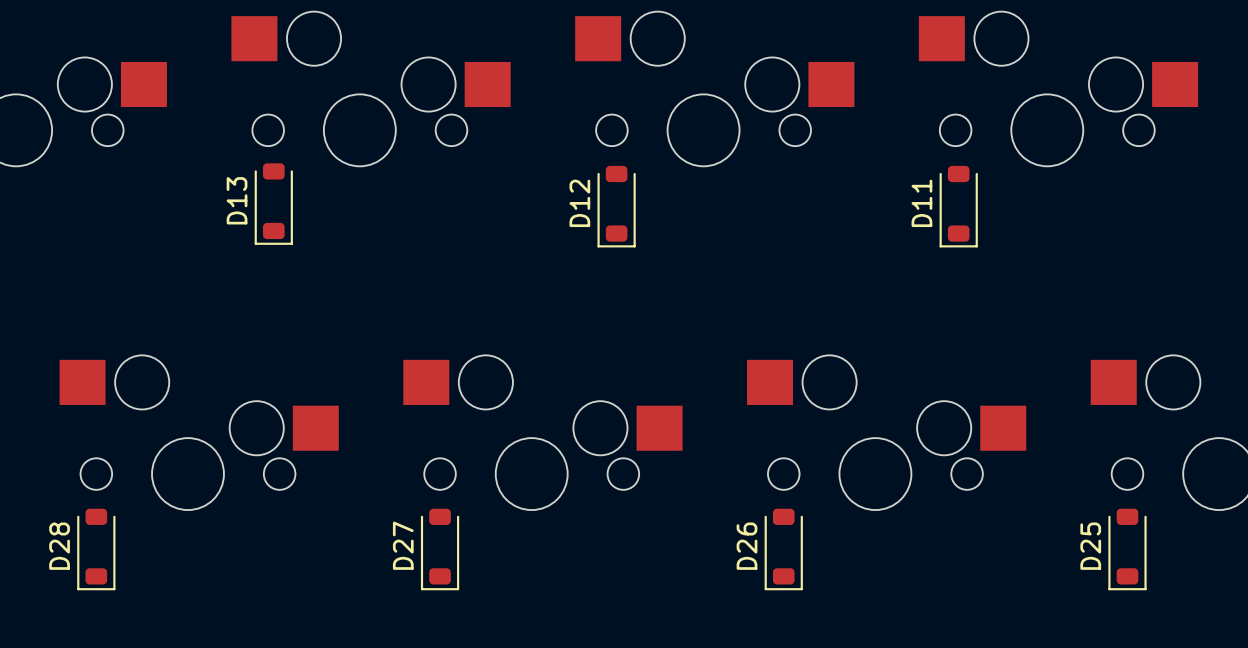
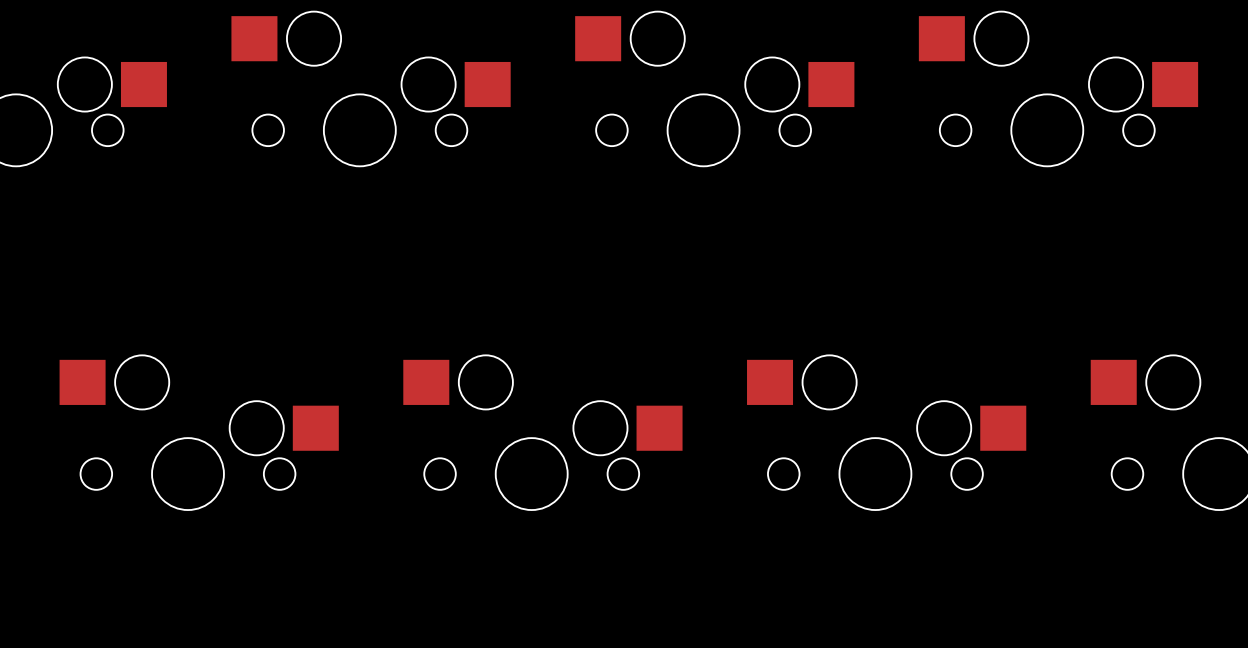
D13: (273, 204) -> none
D12: (616, 206) -> none
D11: (958, 206) -> none
D28: (96, 549) -> none
D27: (440, 549) -> none
D26: (783, 549) -> none
D25: (1127, 549) -> none

